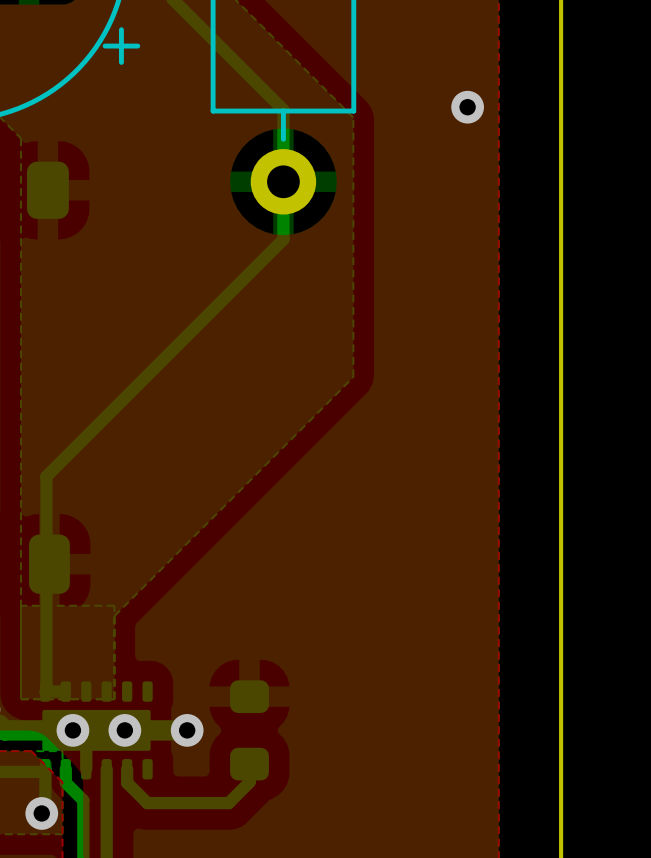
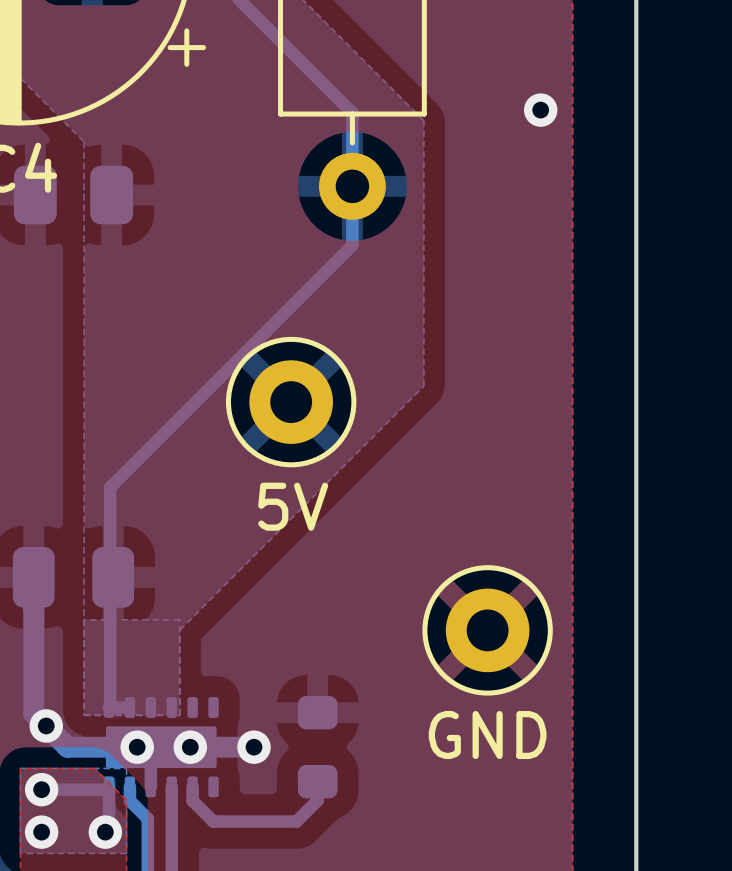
part: none -> 5V (291, 402)
part: none -> GND (487, 630)

